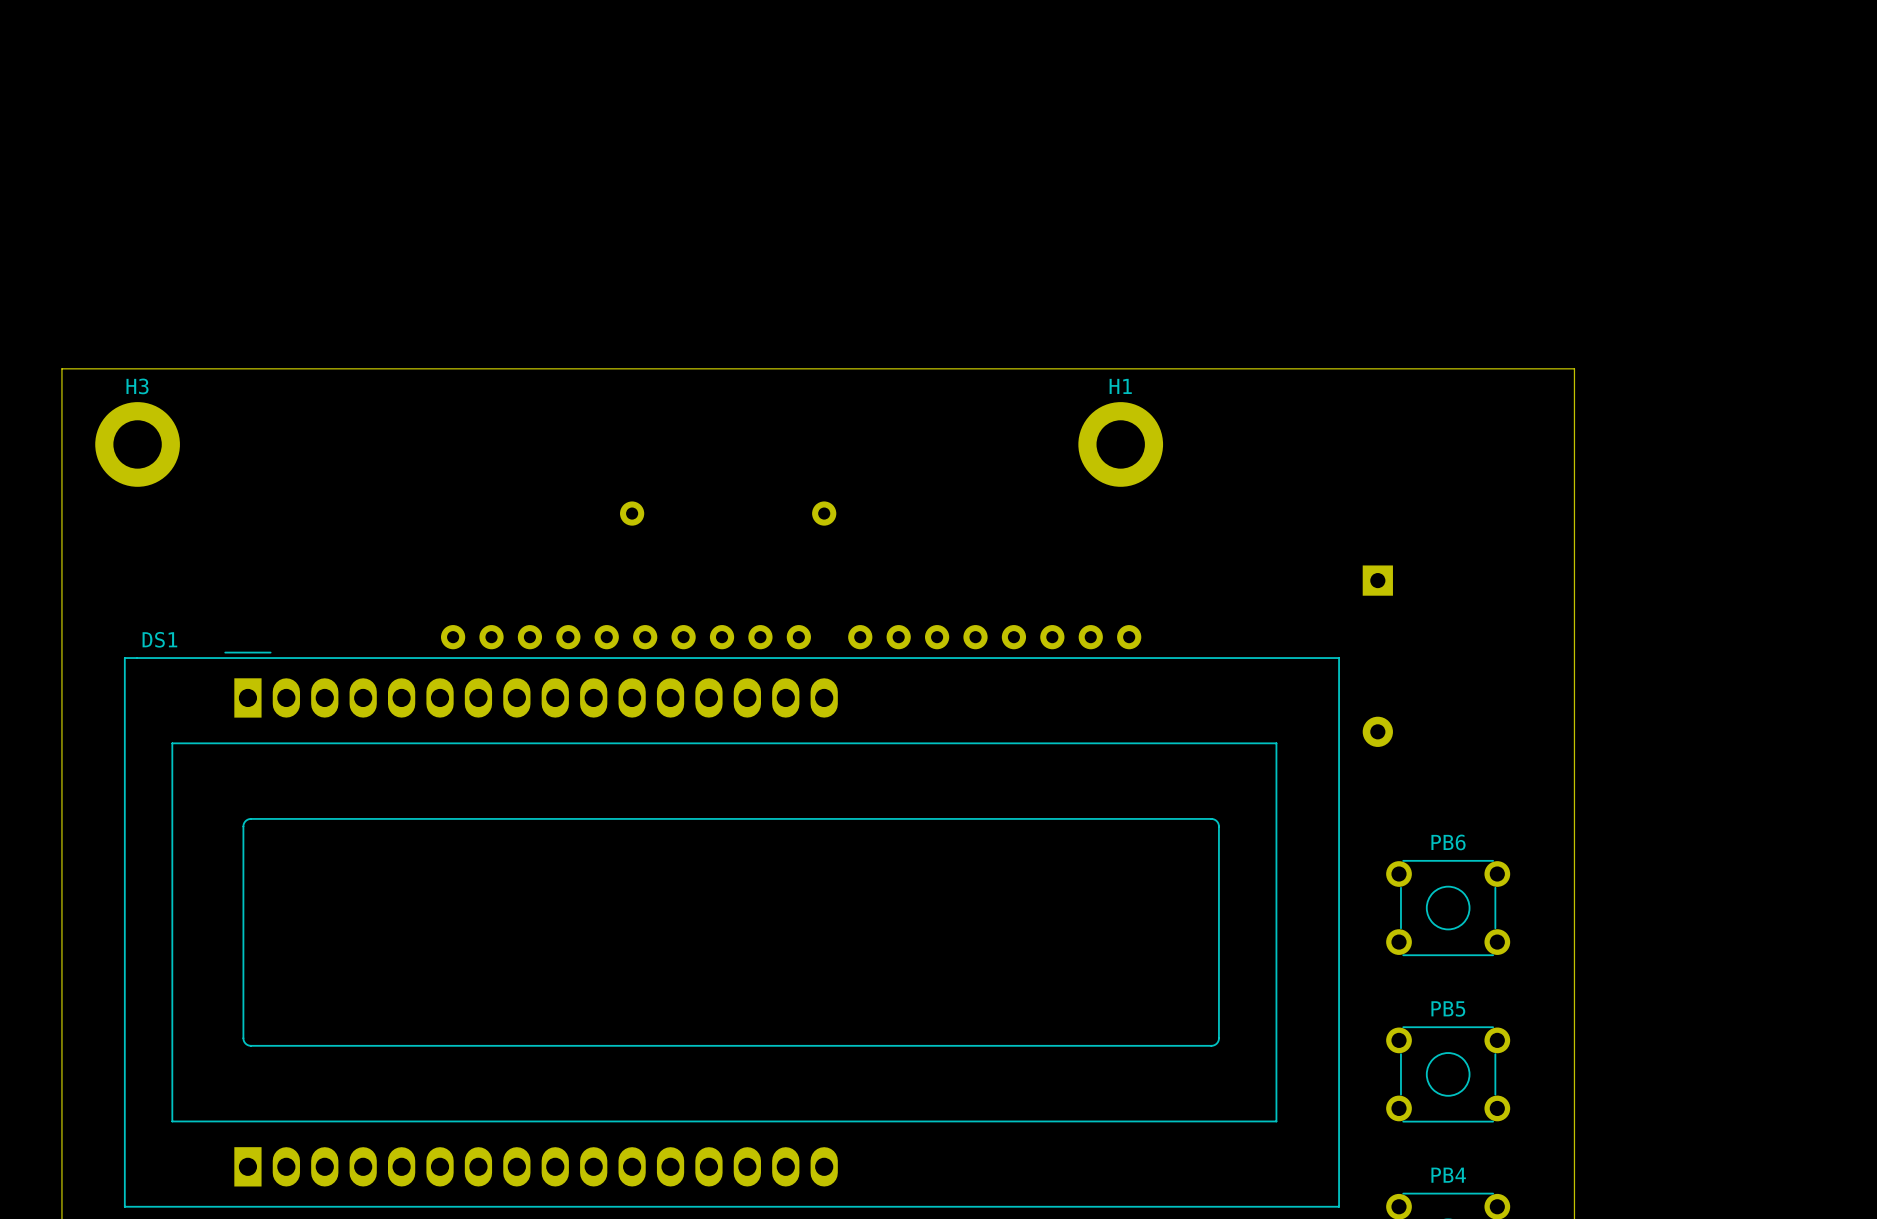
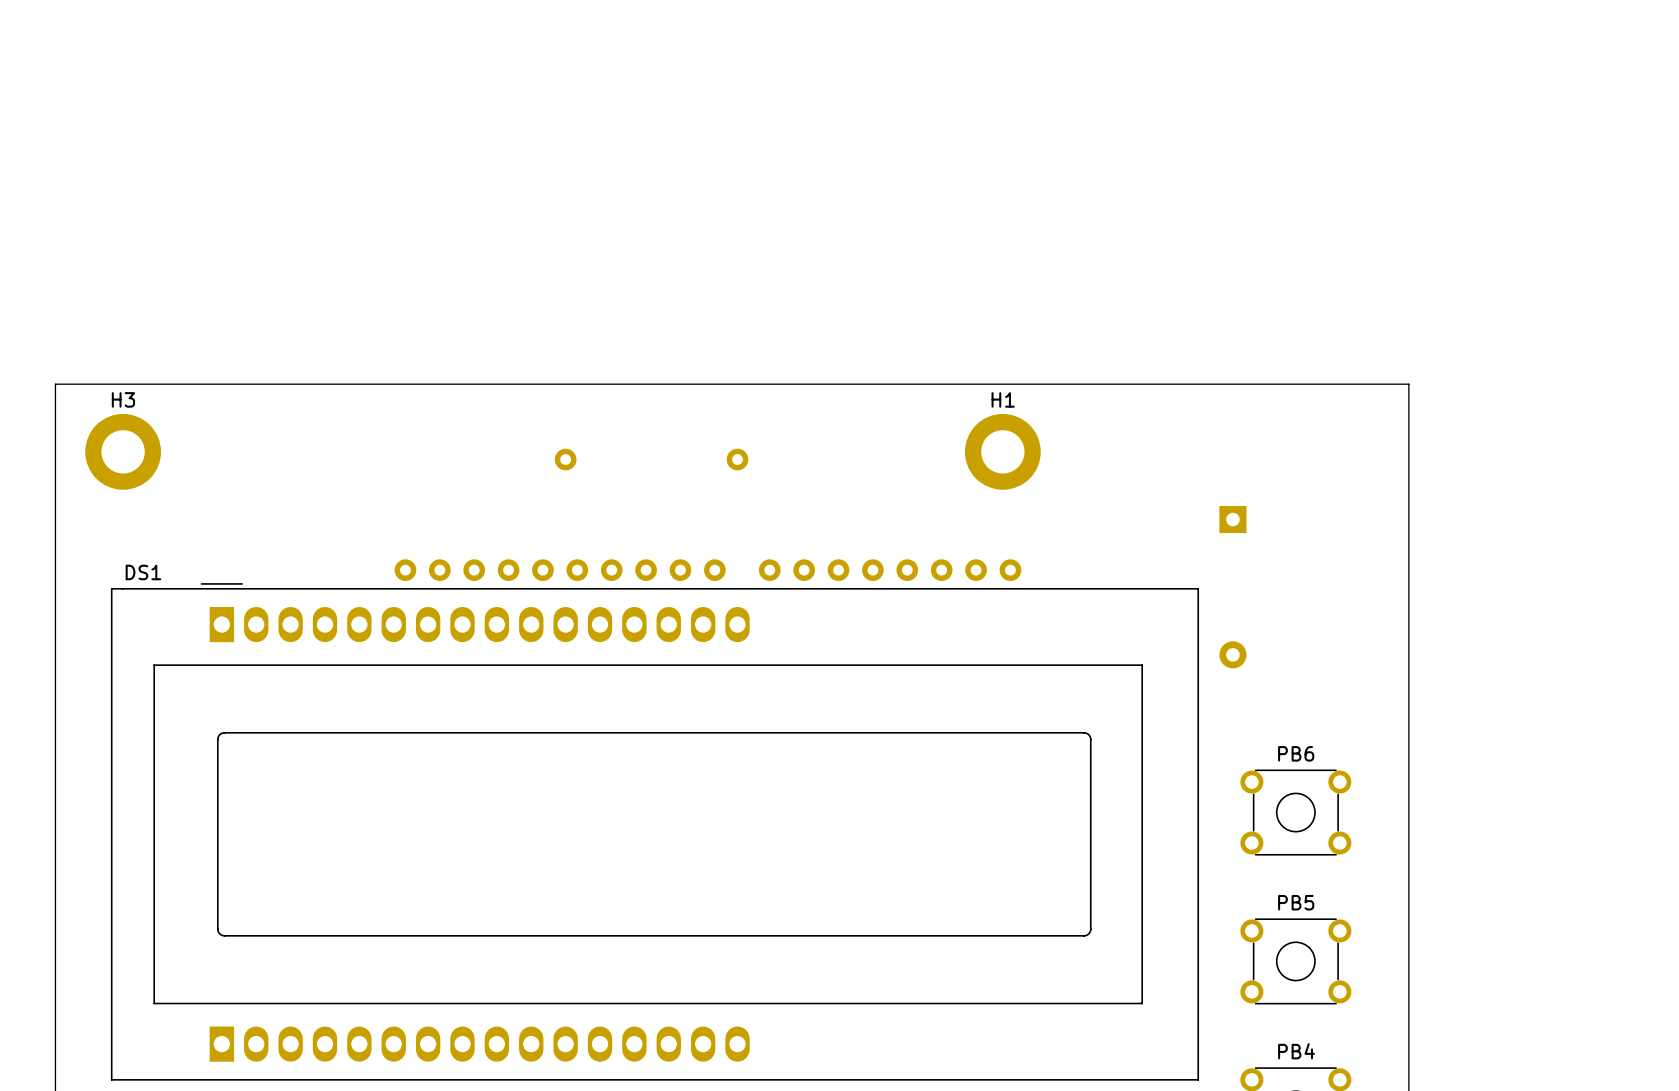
board edge: (61, 429) (61, 368) (1574, 368) (1574, 429) -> (55, 384) (1408, 384)
H3 position: (137, 444) -> (123, 451)
H1 position: (1120, 444) -> (1002, 451)

